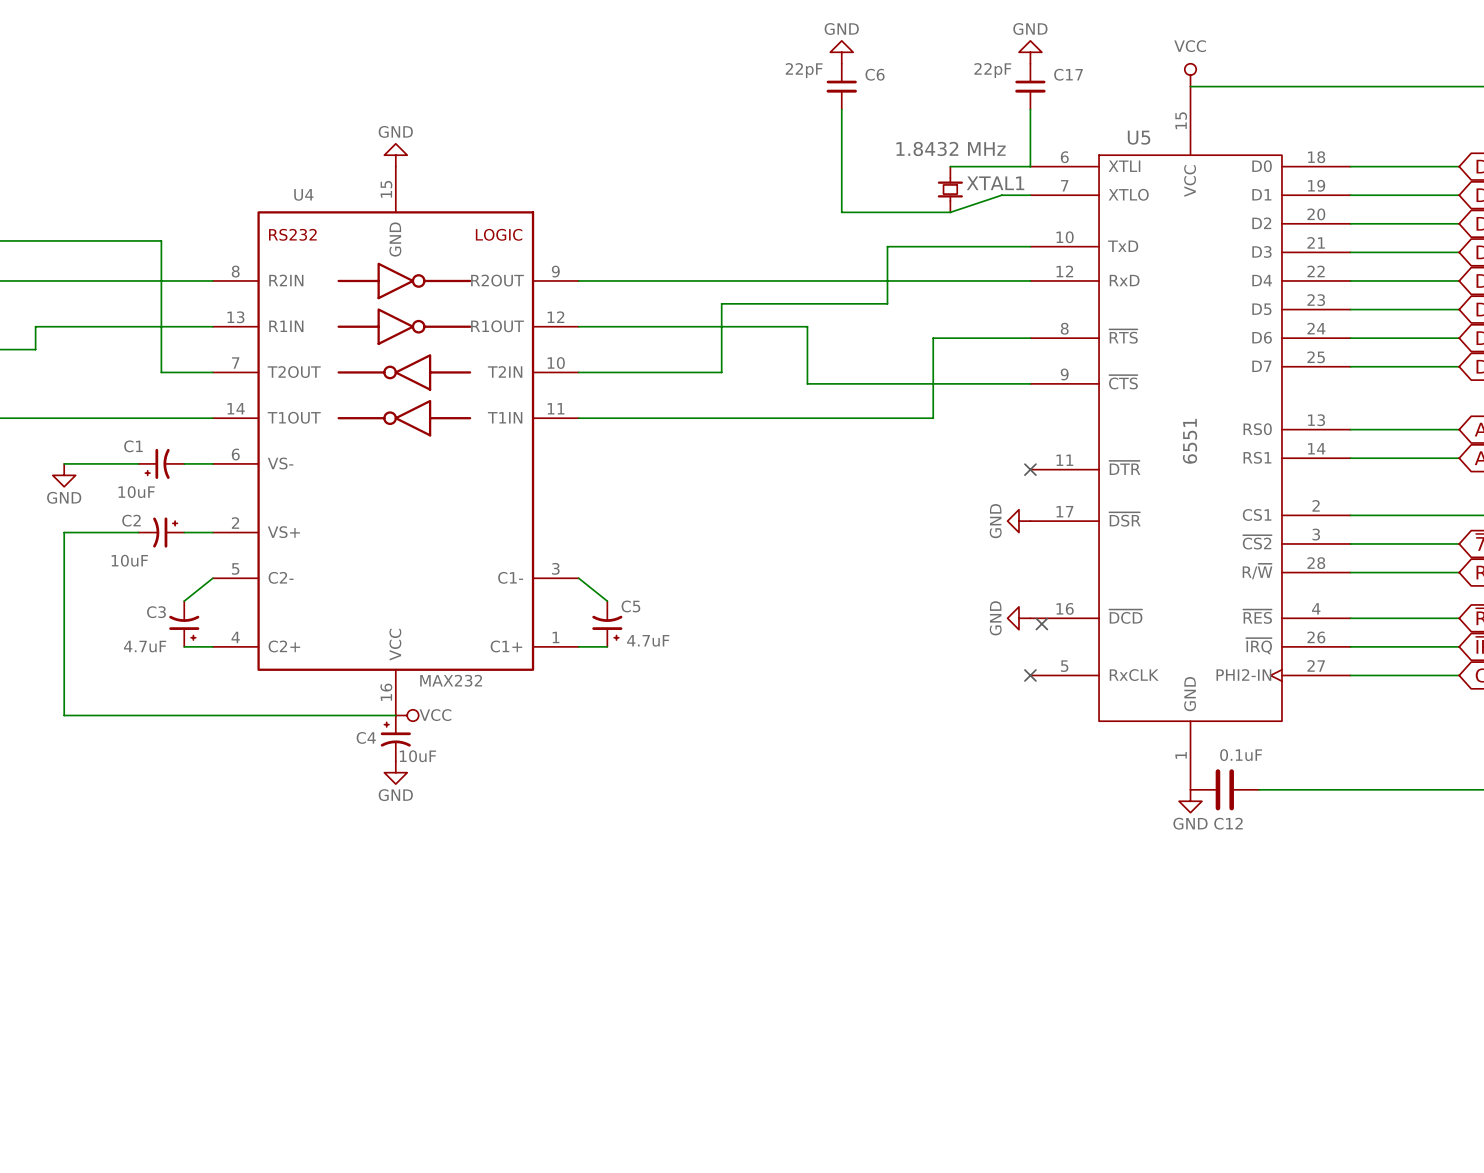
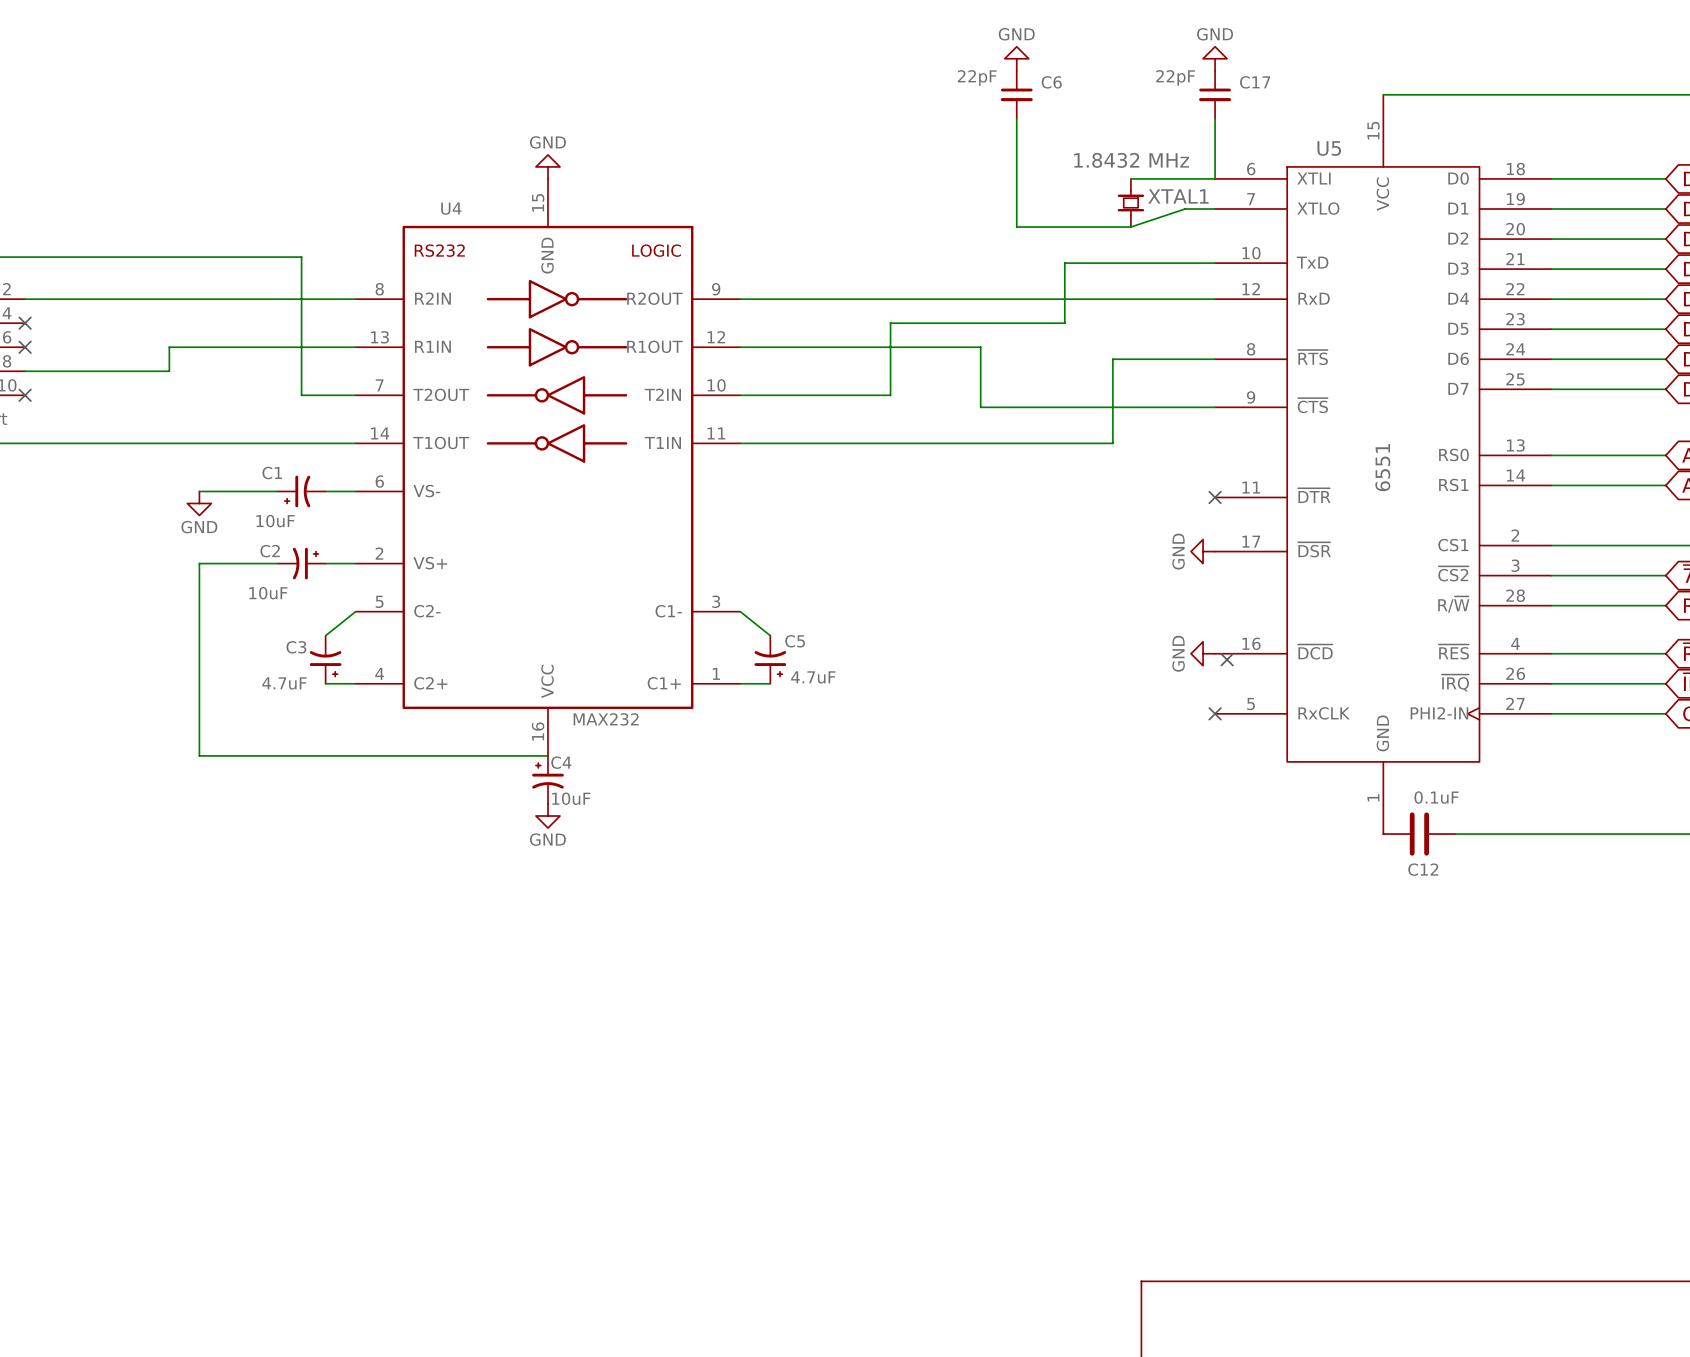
power symbol: VCC (1190, 75) -> none
power symbol: VCC (407, 715) -> none
C4 name position: C4 (366, 737) -> C4 (561, 762)
power symbol: GND (1190, 801) -> none

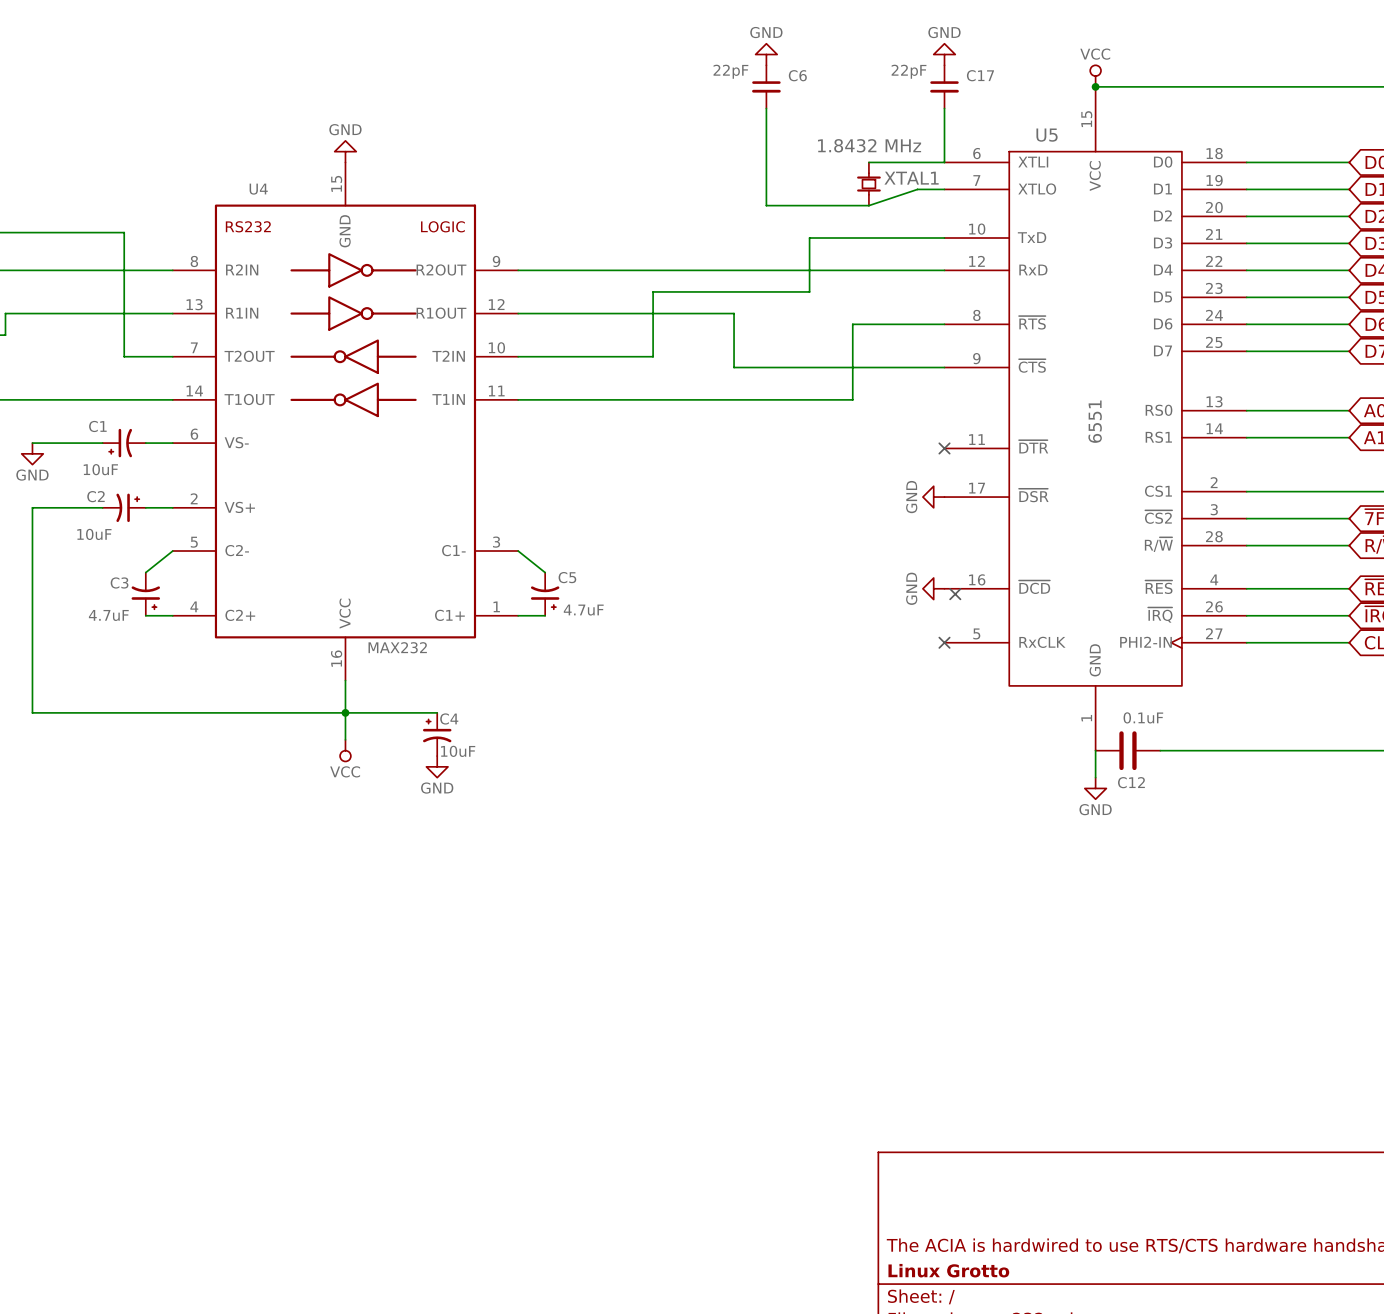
power symbol: none -> VCC (1095, 76)
junction: none -> (1095, 86)
wire: (199, 755) (547, 755) -> (32, 680) (32, 712) (437, 712)
C4 position: (547, 779) -> (437, 734)
junction: none -> (345, 712)
power symbol position: GND (547, 816) -> GND (437, 766)
power symbol: none -> VCC (345, 750)
wire: none -> (1095, 750) (1095, 777)
power symbol: none -> GND (1095, 788)

